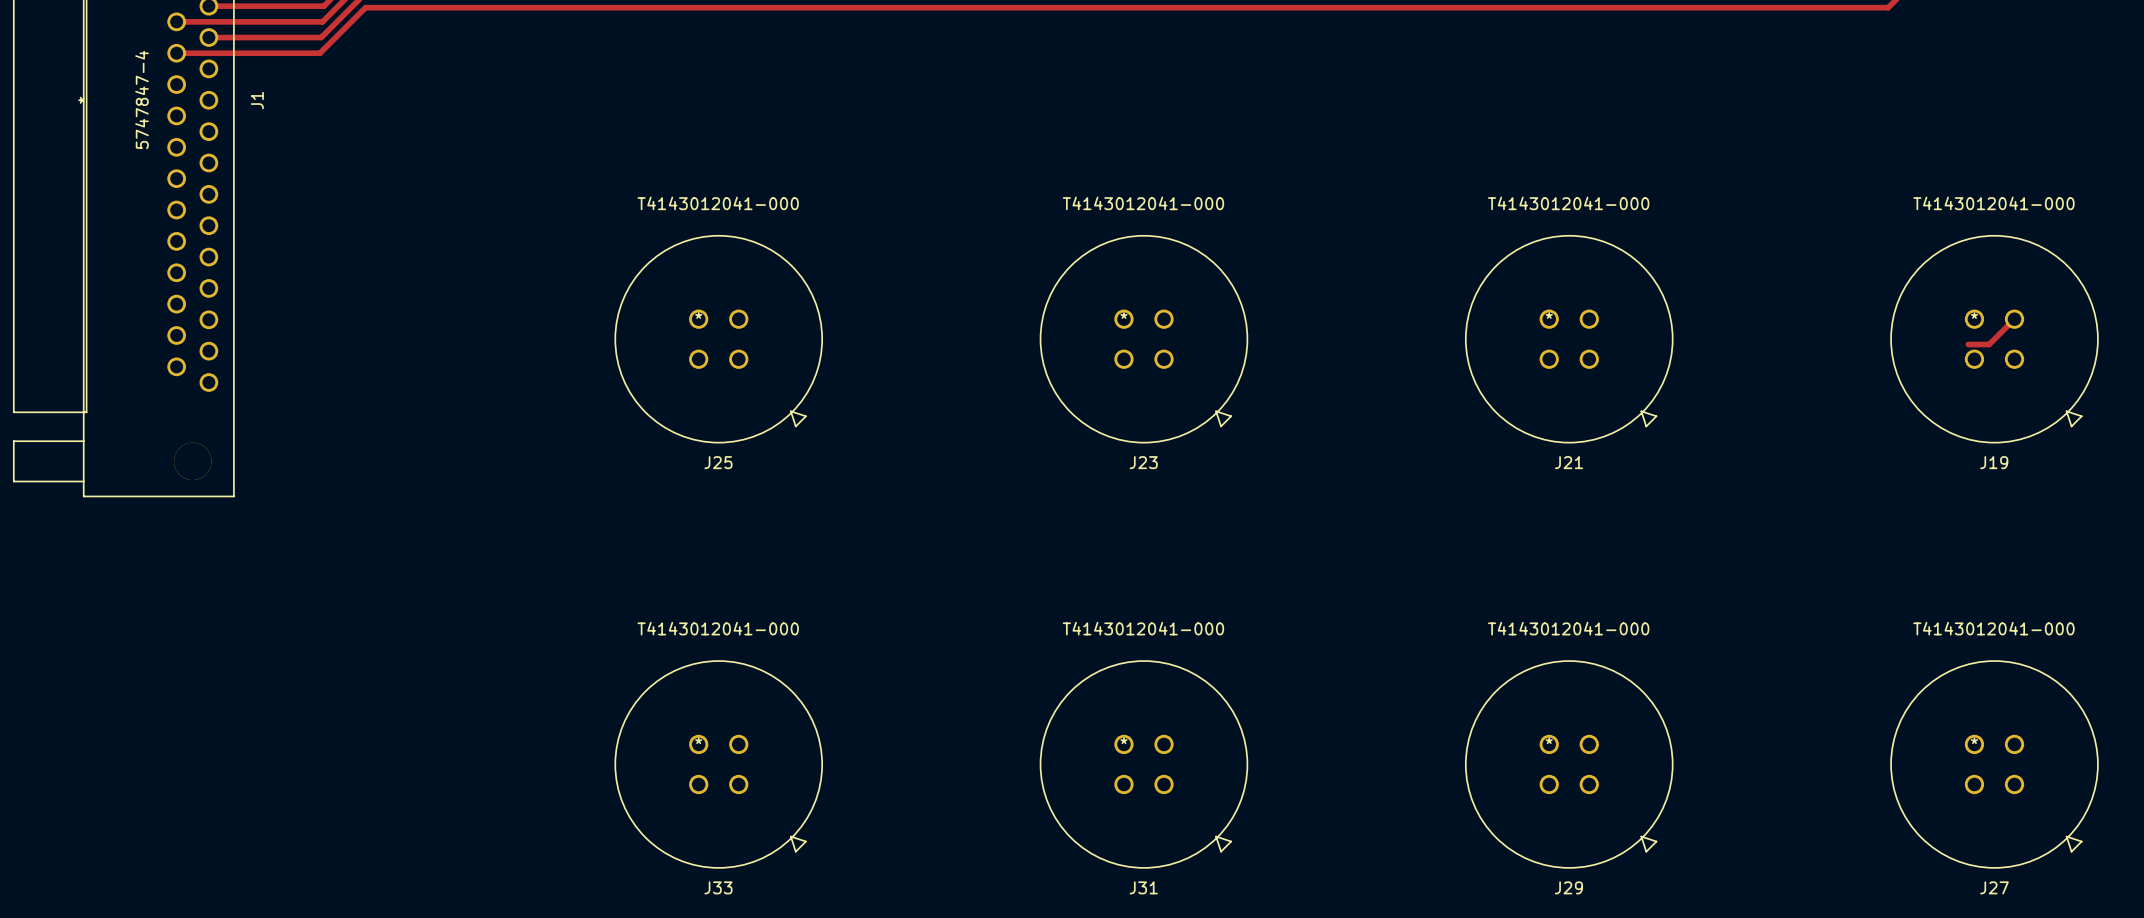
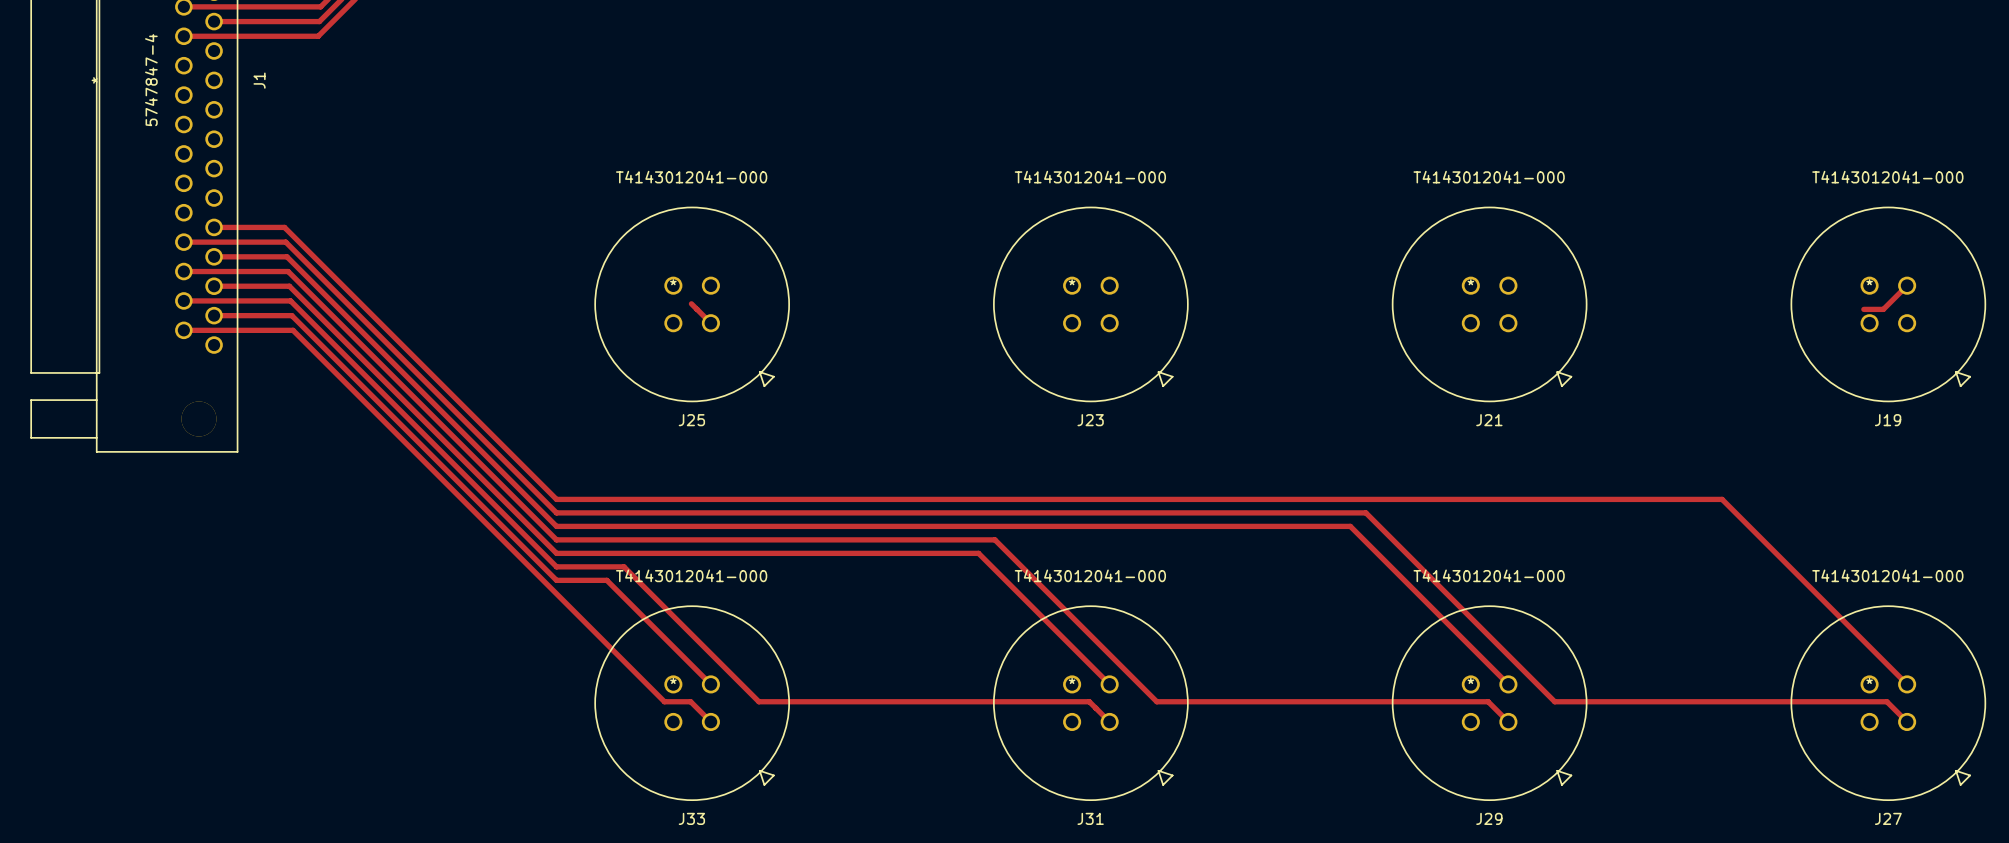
track: none -> (214, 227) (284, 227) (556, 499) (1722, 499) (1907, 684)
track: none -> (183, 242) (285, 242) (556, 512) (1365, 512) (1554, 701) (1886, 701) (1907, 721)
track: none -> (214, 256) (287, 256) (556, 526) (1350, 526) (1508, 684)
track: none -> (183, 271) (288, 271) (556, 539) (994, 539) (1156, 701) (1488, 701) (1508, 721)
track: none -> (214, 286) (289, 286) (556, 553) (978, 553) (1109, 684)
track: none -> (183, 300) (290, 300) (556, 566) (624, 566) (758, 701) (1089, 701) (1095, 708)
track: none -> (691, 303) (697, 309)
track: none -> (697, 309) (710, 323)
track: none -> (214, 315) (291, 315) (556, 580) (606, 580) (710, 684)
track: none -> (183, 330) (293, 330) (664, 701) (690, 701) (710, 721)
track: none -> (1095, 708) (1109, 721)

